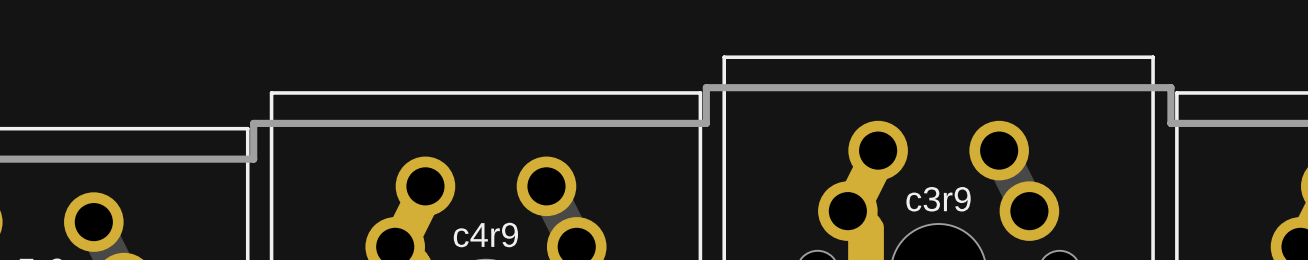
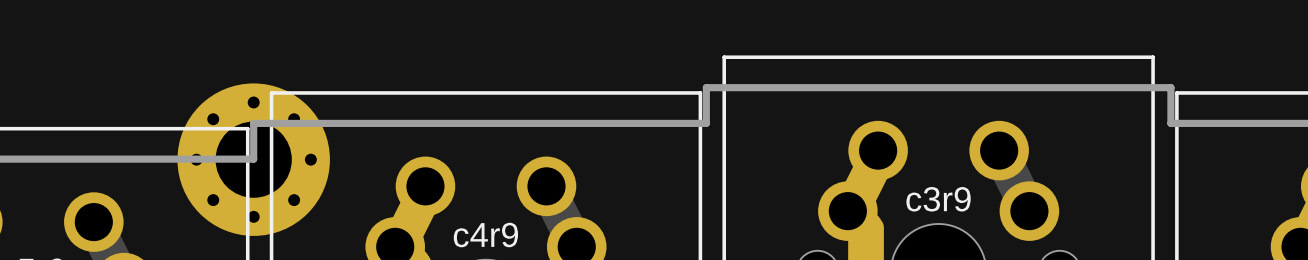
part: none -> (253, 159)

